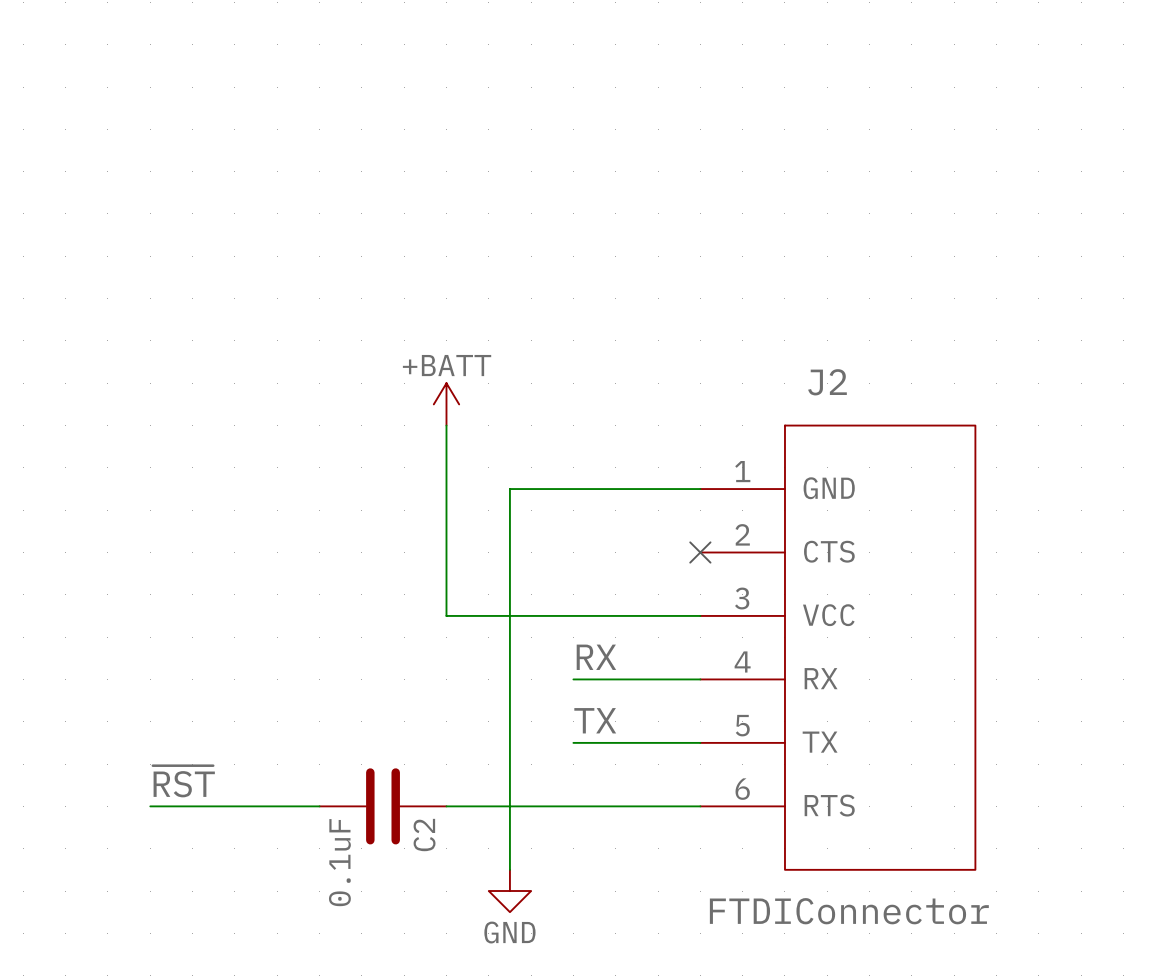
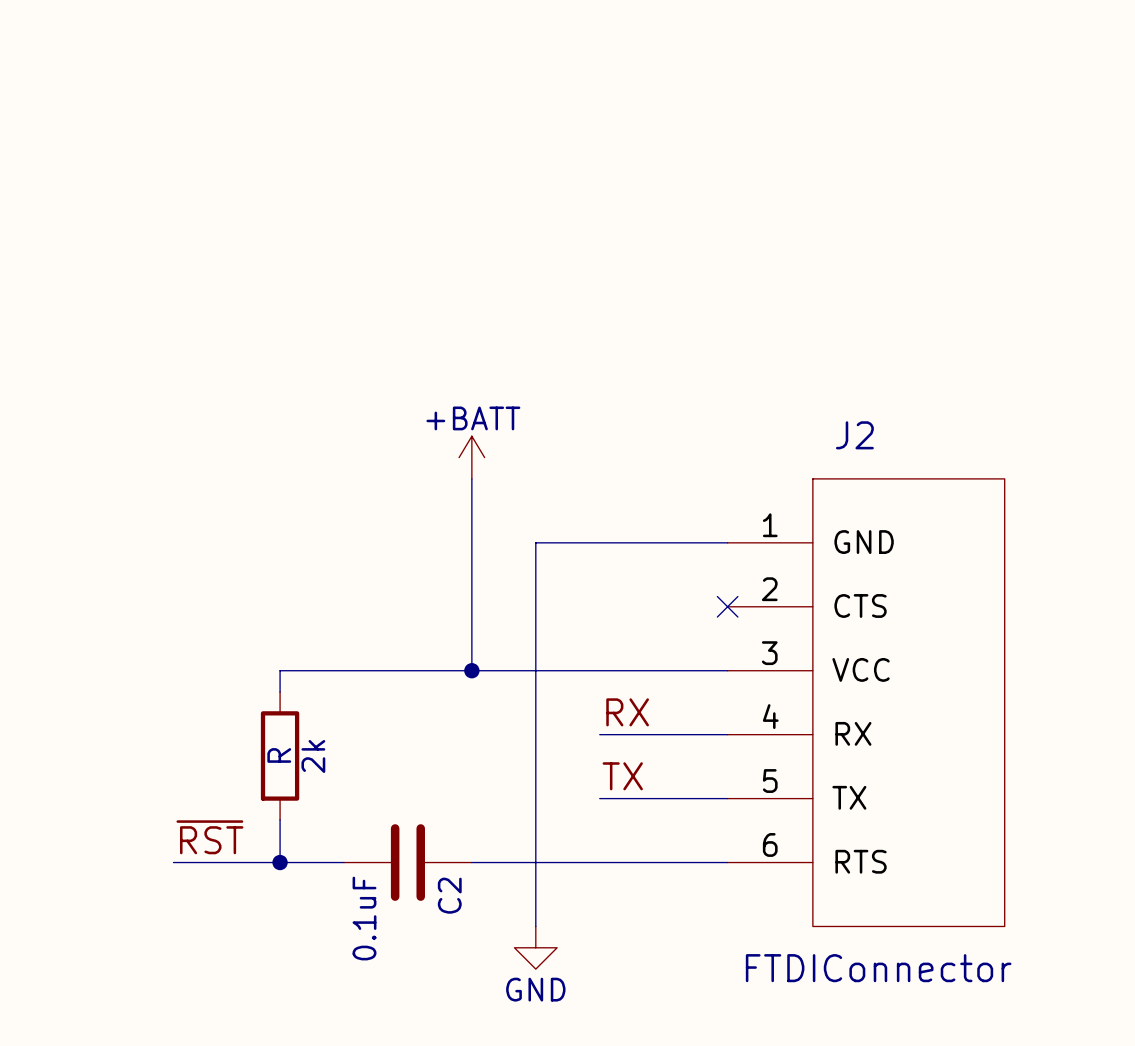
wire: none -> (471, 670) (280, 670) (280, 692)
junction: none -> (471, 670)
2k: none -> R (280, 755)
wire: none -> (280, 819) (280, 862)
junction: none -> (280, 862)

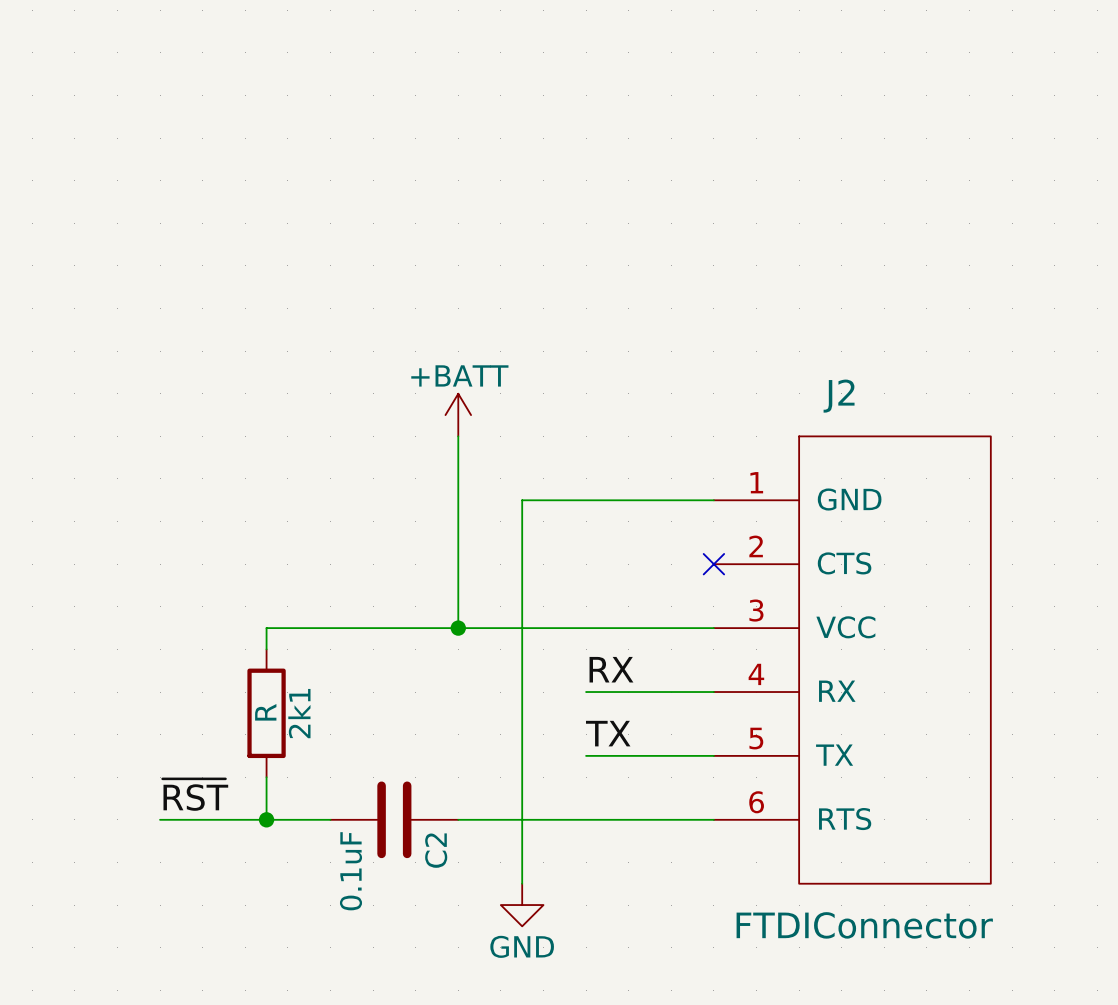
2k name: 2k (313, 756) -> 2k1 (299, 713)

